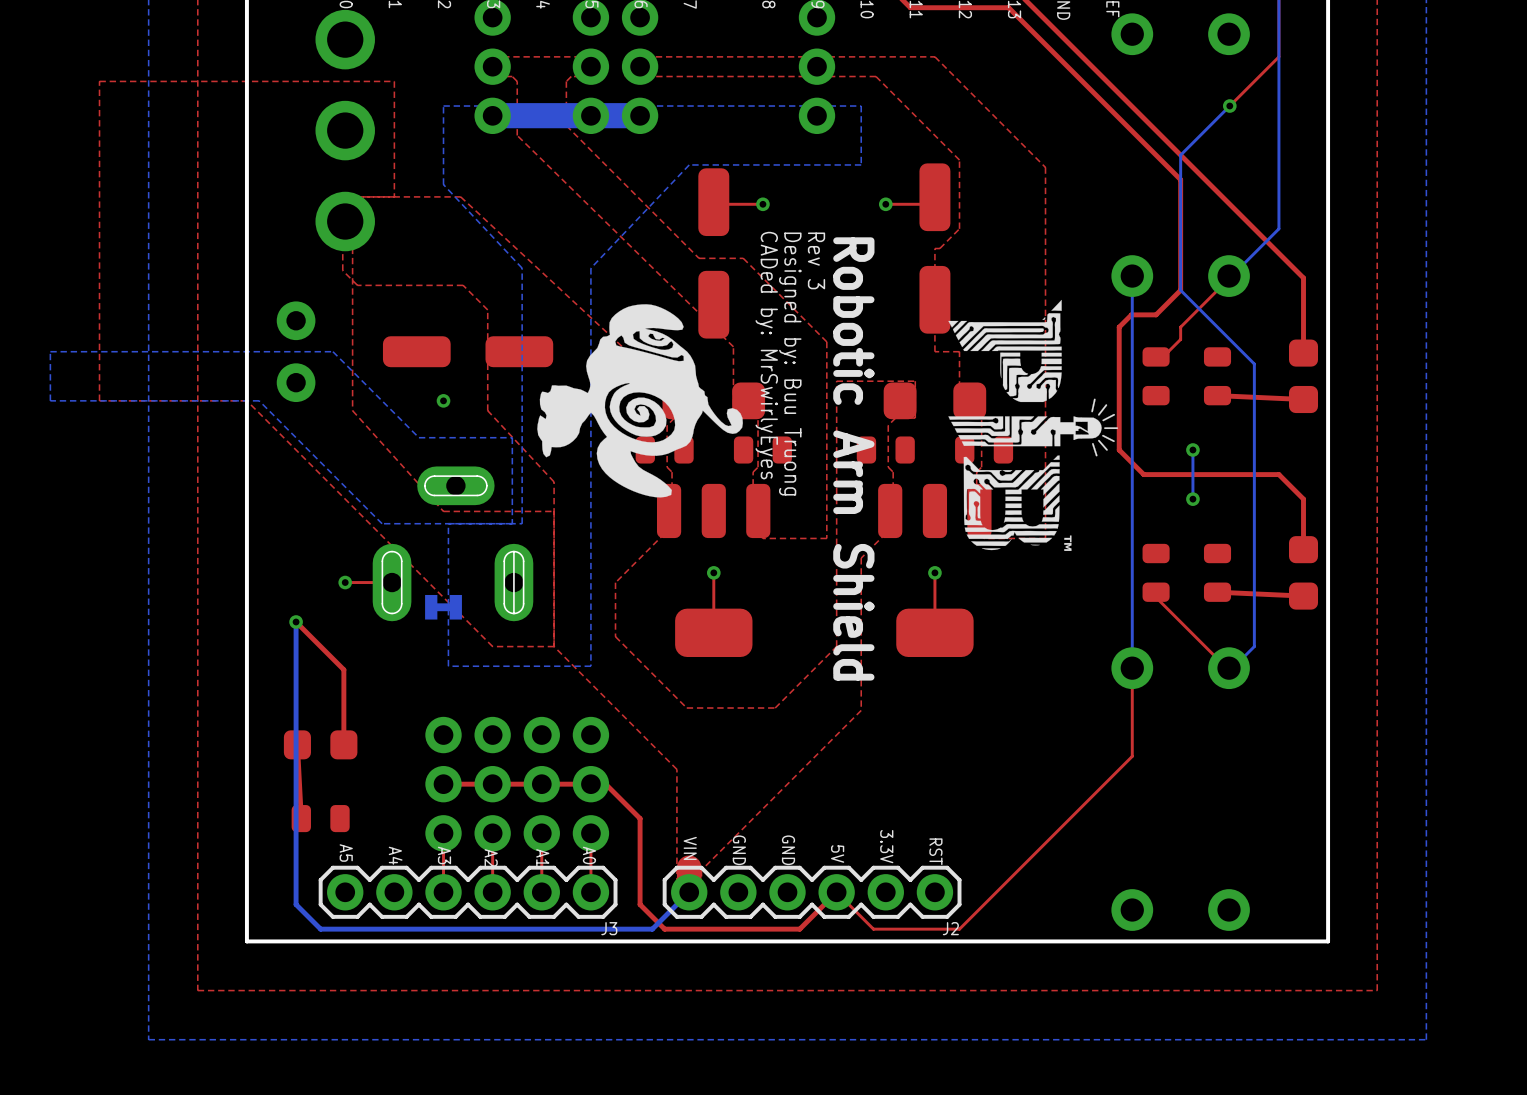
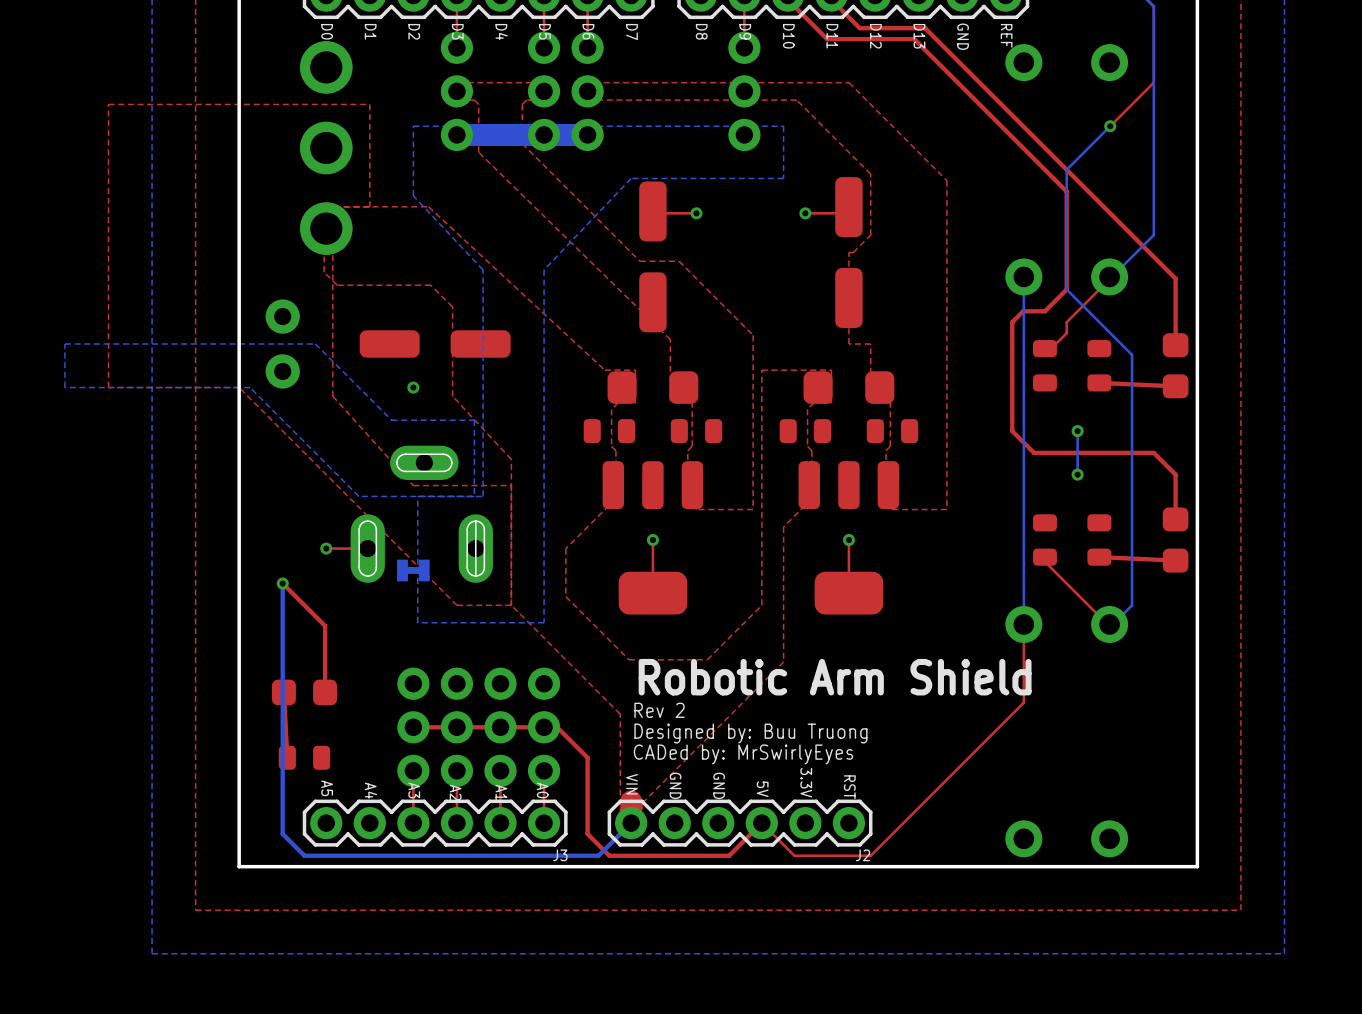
text: Rev 3 (816, 260) -> none
drawing: [948, 299, 1119, 552] -> none
drawing: [537, 304, 743, 498] -> none
text: CADed by: MrSwirlyEyes (766, 355) -> none
text: Designed by: Buu Truong (790, 364) -> none
text: Robotic Arm Shield (853, 458) -> none
text: none -> Robotic Arm Shield (835, 677)
text: none -> Rev 2 (659, 710)
text: none -> Designed by: Buu Truong (750, 733)
text: none -> CADed by: MrSwirlyEyes (743, 754)

